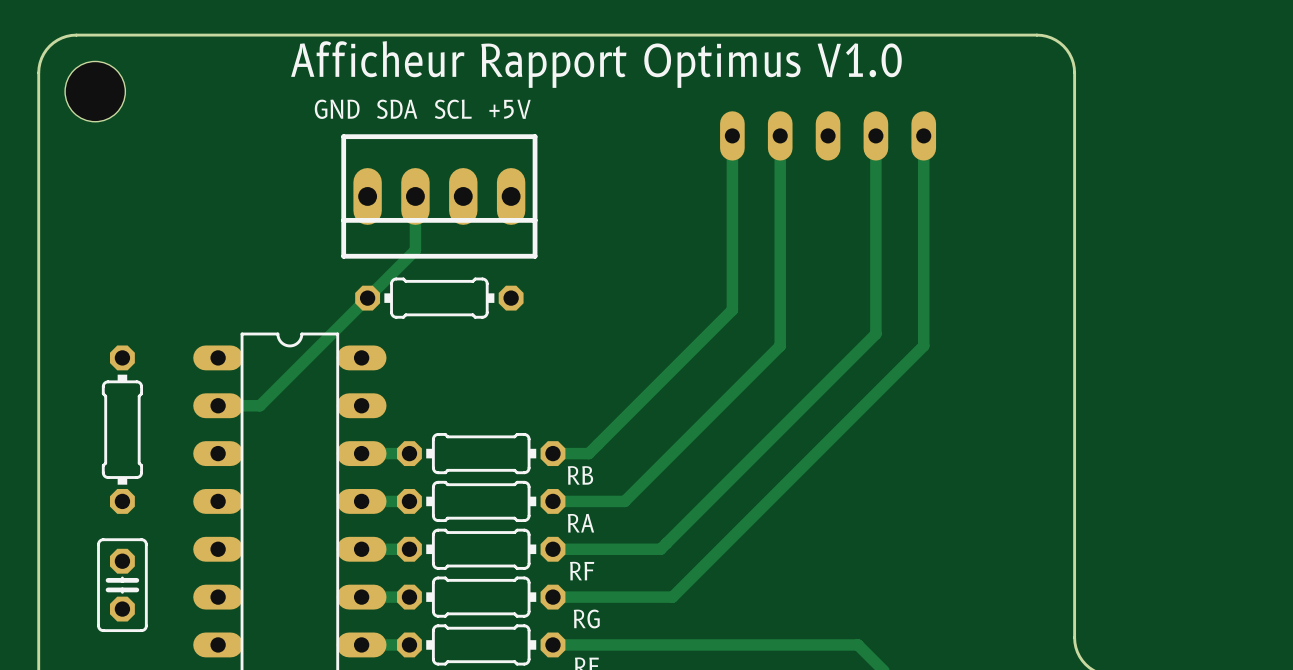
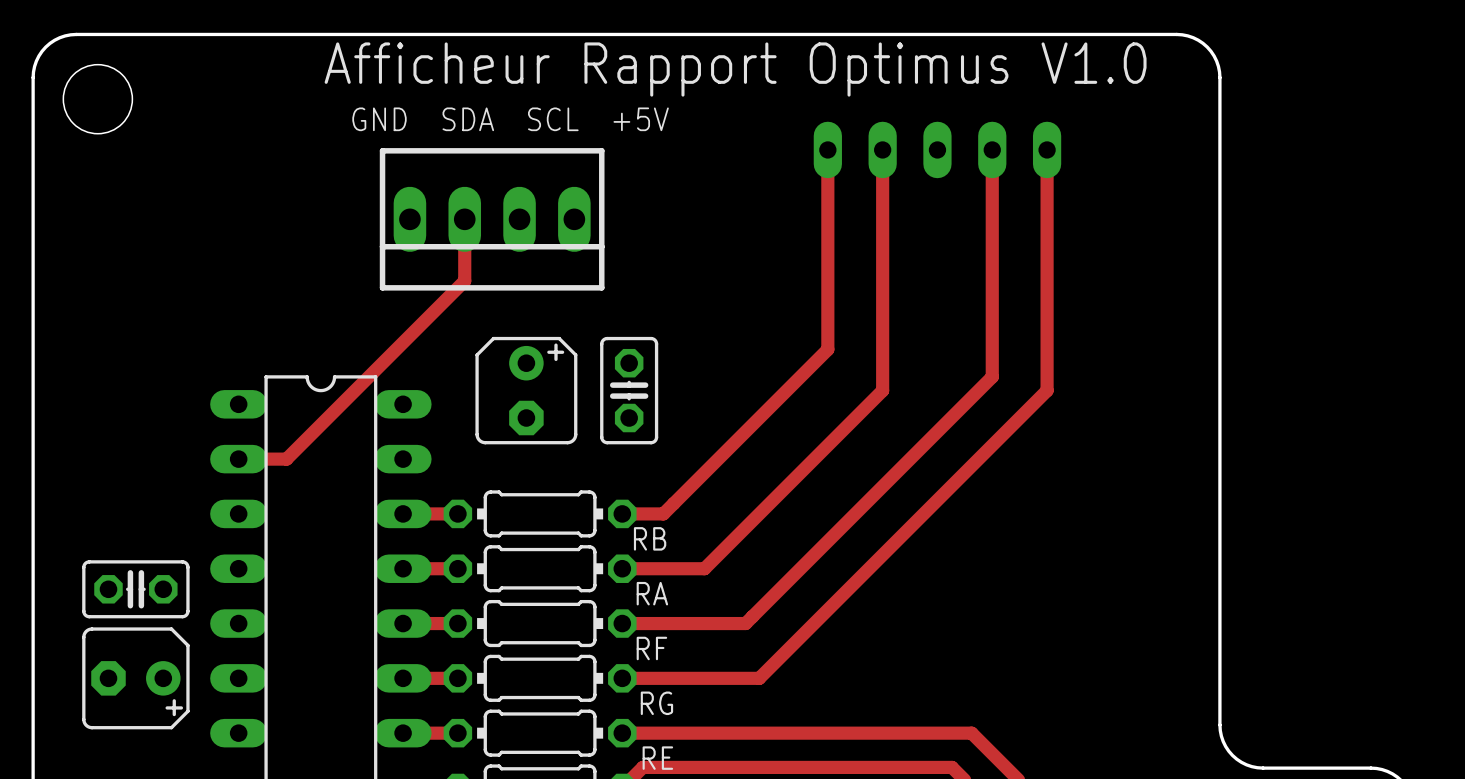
part: (439, 298) -> none
part: none -> (526, 390)
part: none -> (629, 390)
part: (122, 429) -> none
part: none -> (135, 589)
part footprint: [97, 538, 148, 633] -> [82, 627, 190, 730]

